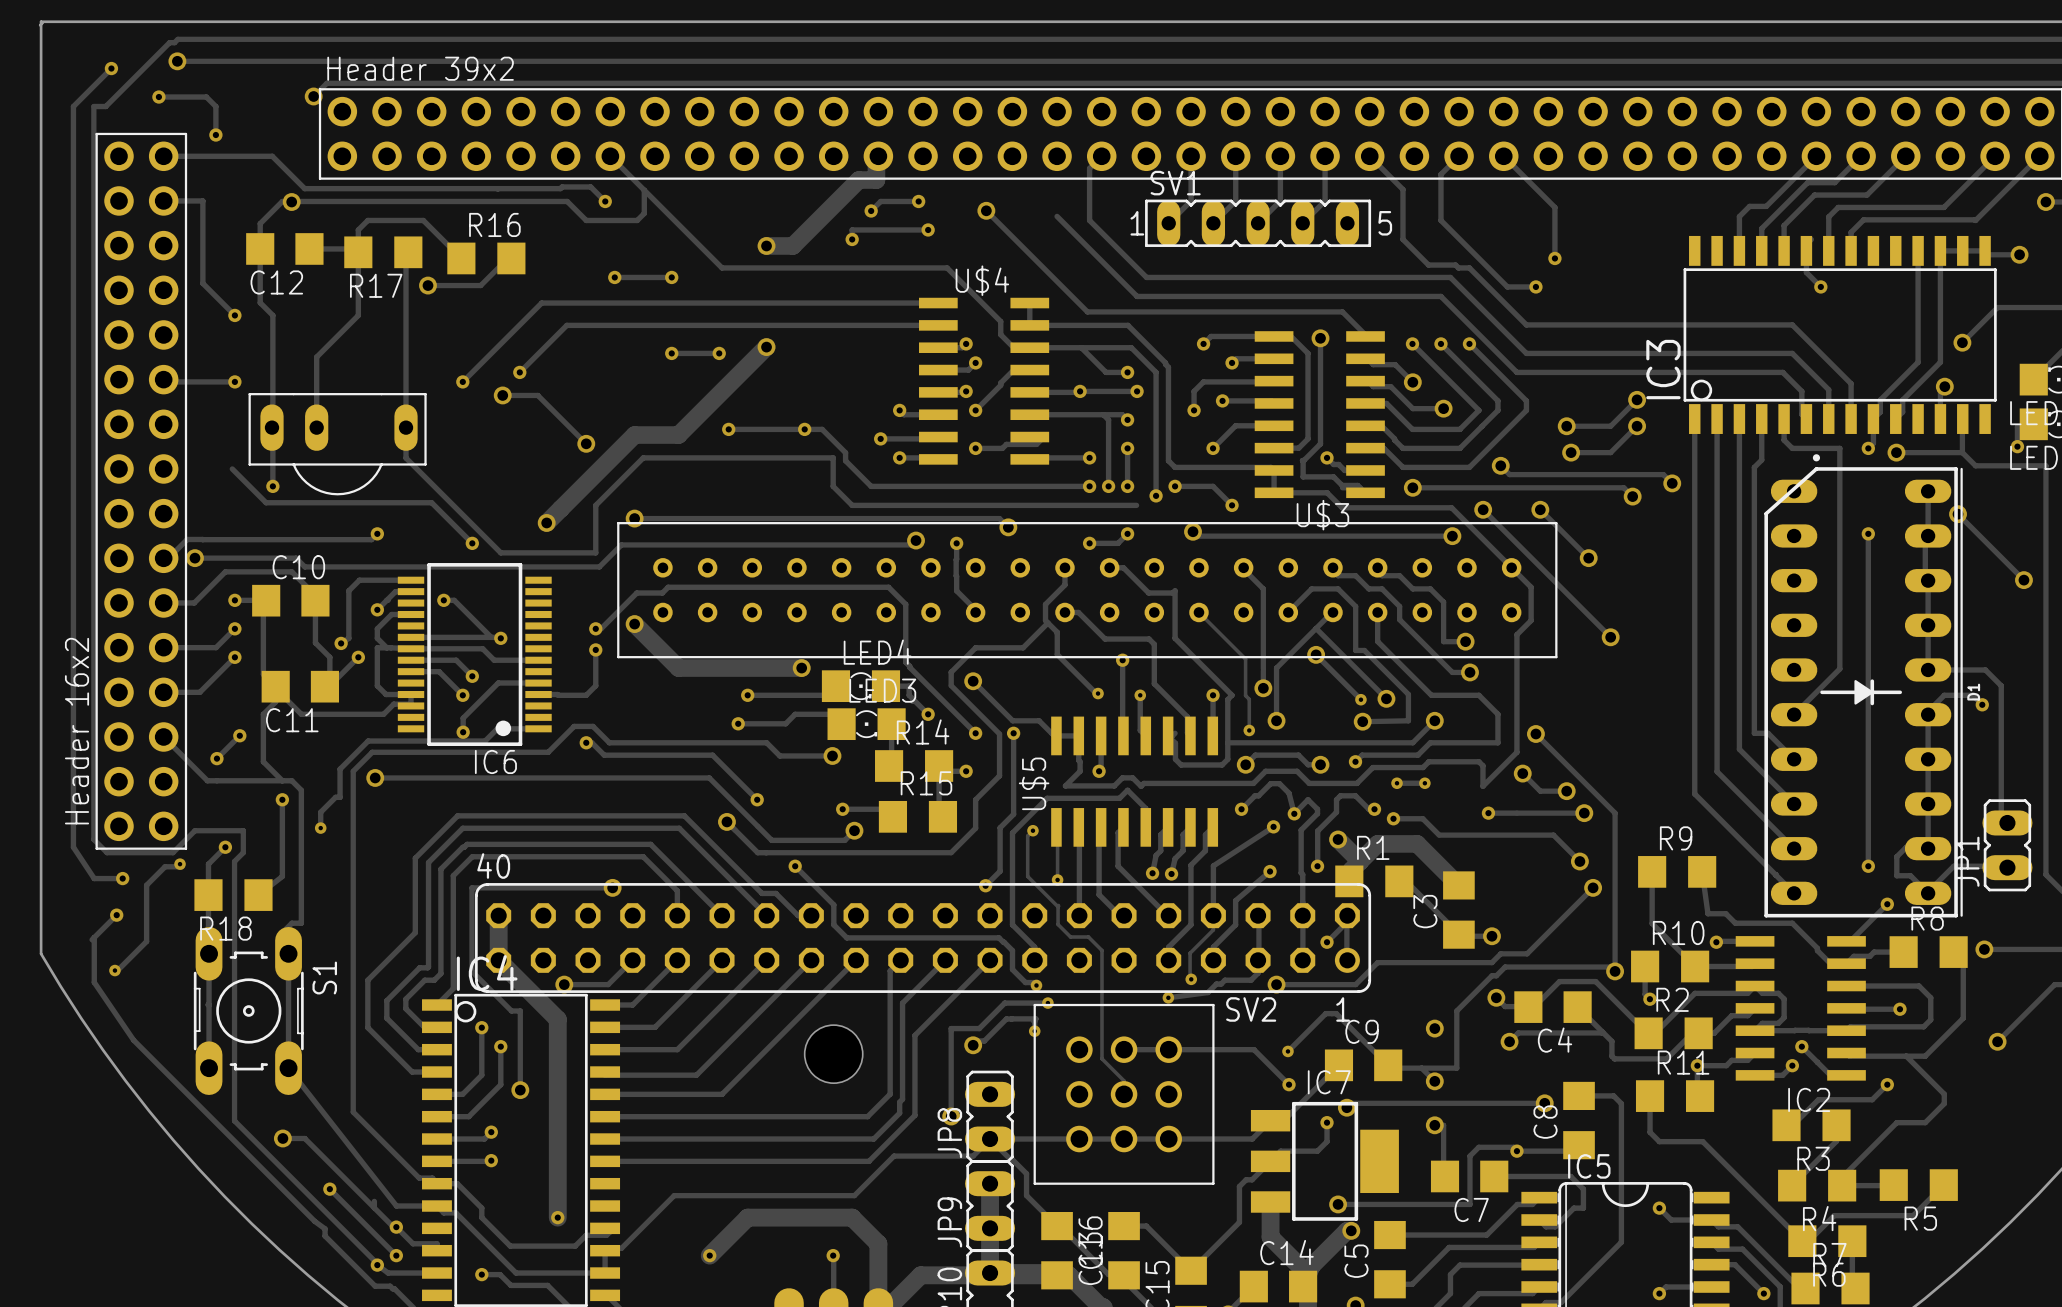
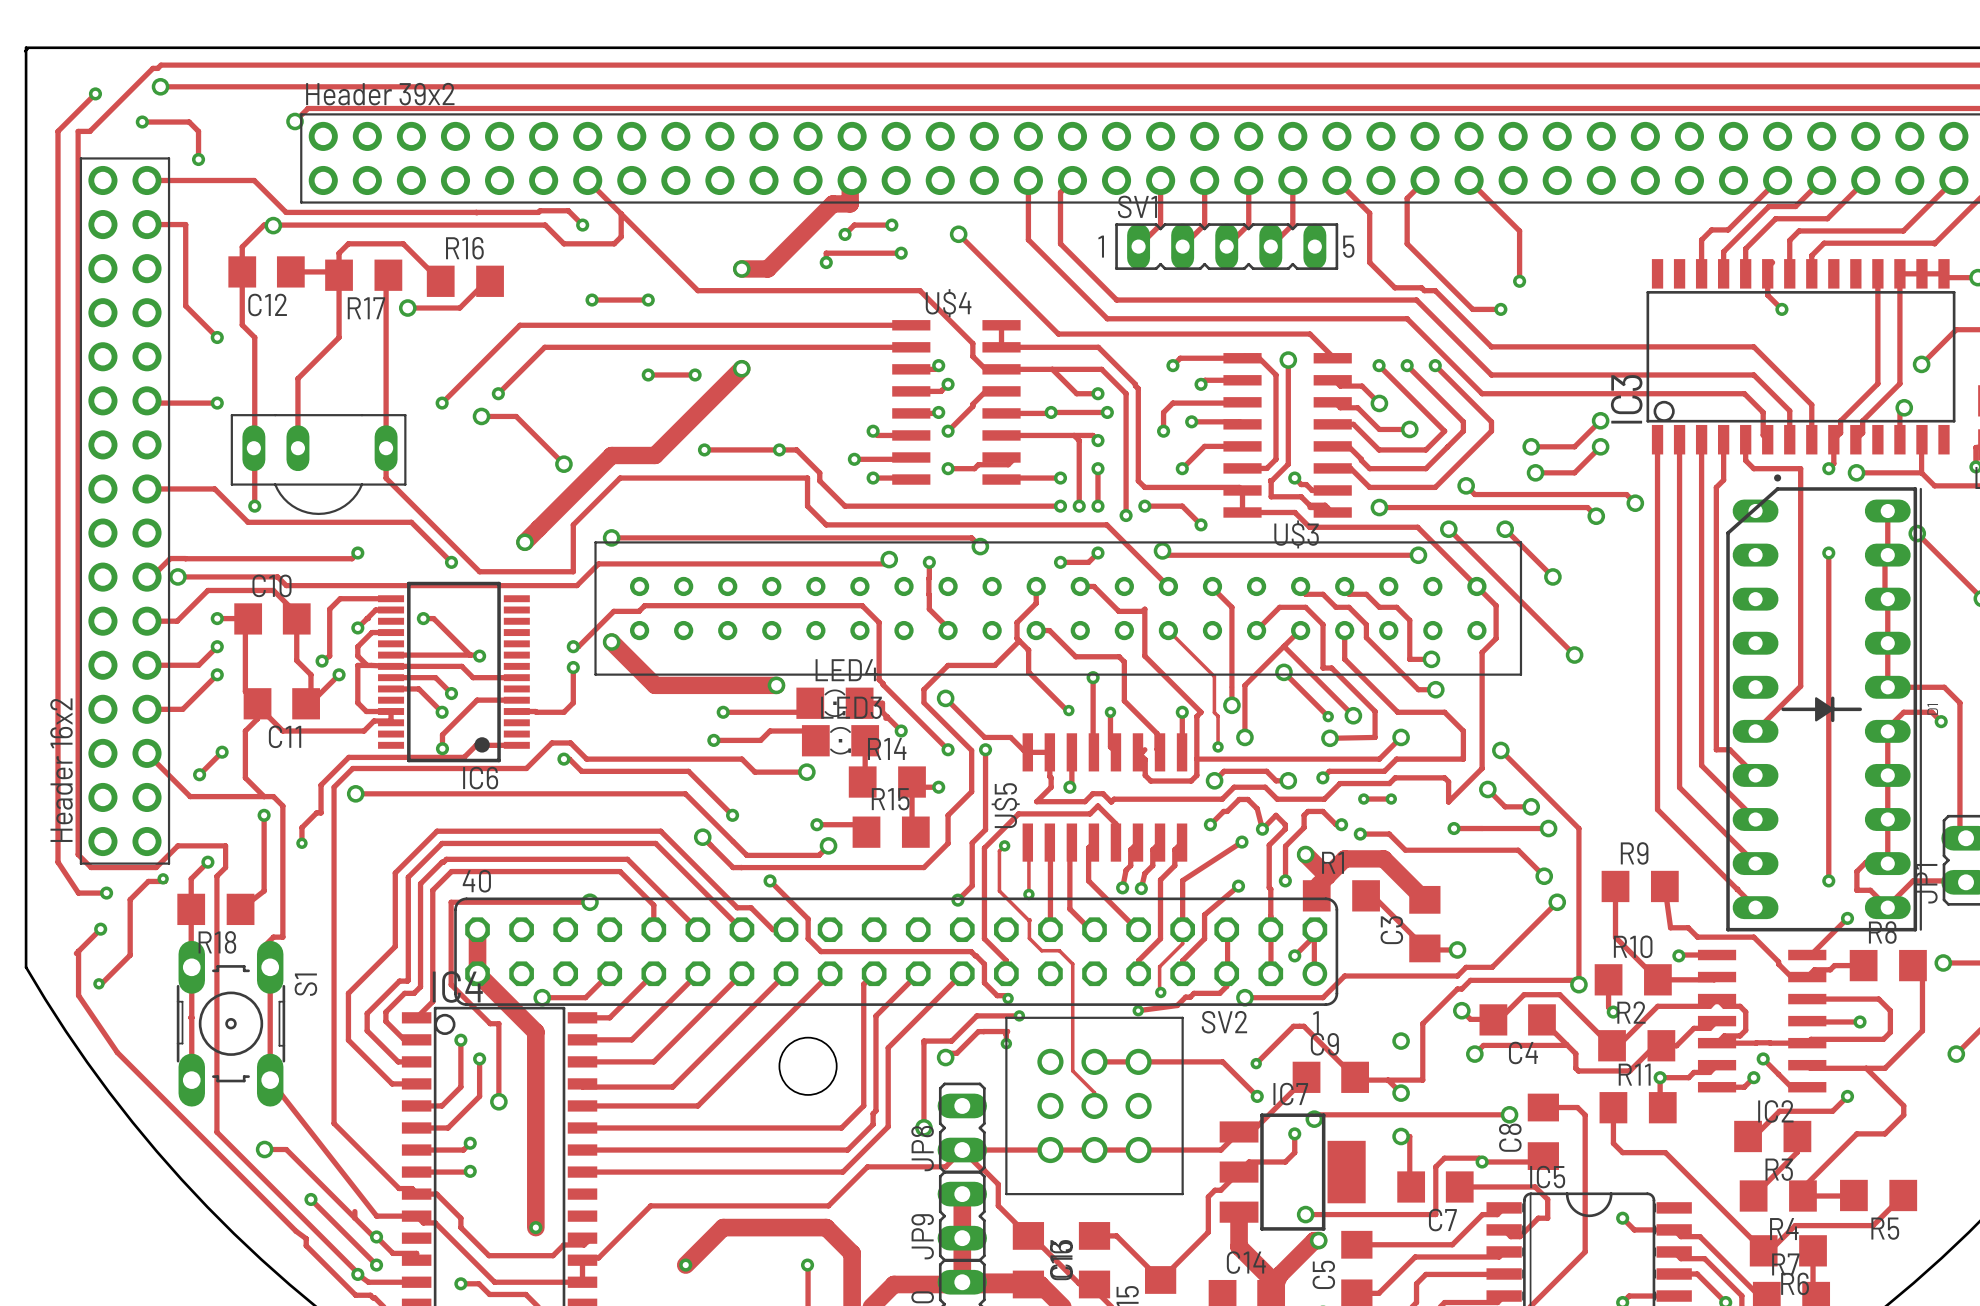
track: none -> (1028, 180) (1028, 239)
track: none -> (153, 488) (214, 488)
track: none -> (1106, 524) (1168, 586)

